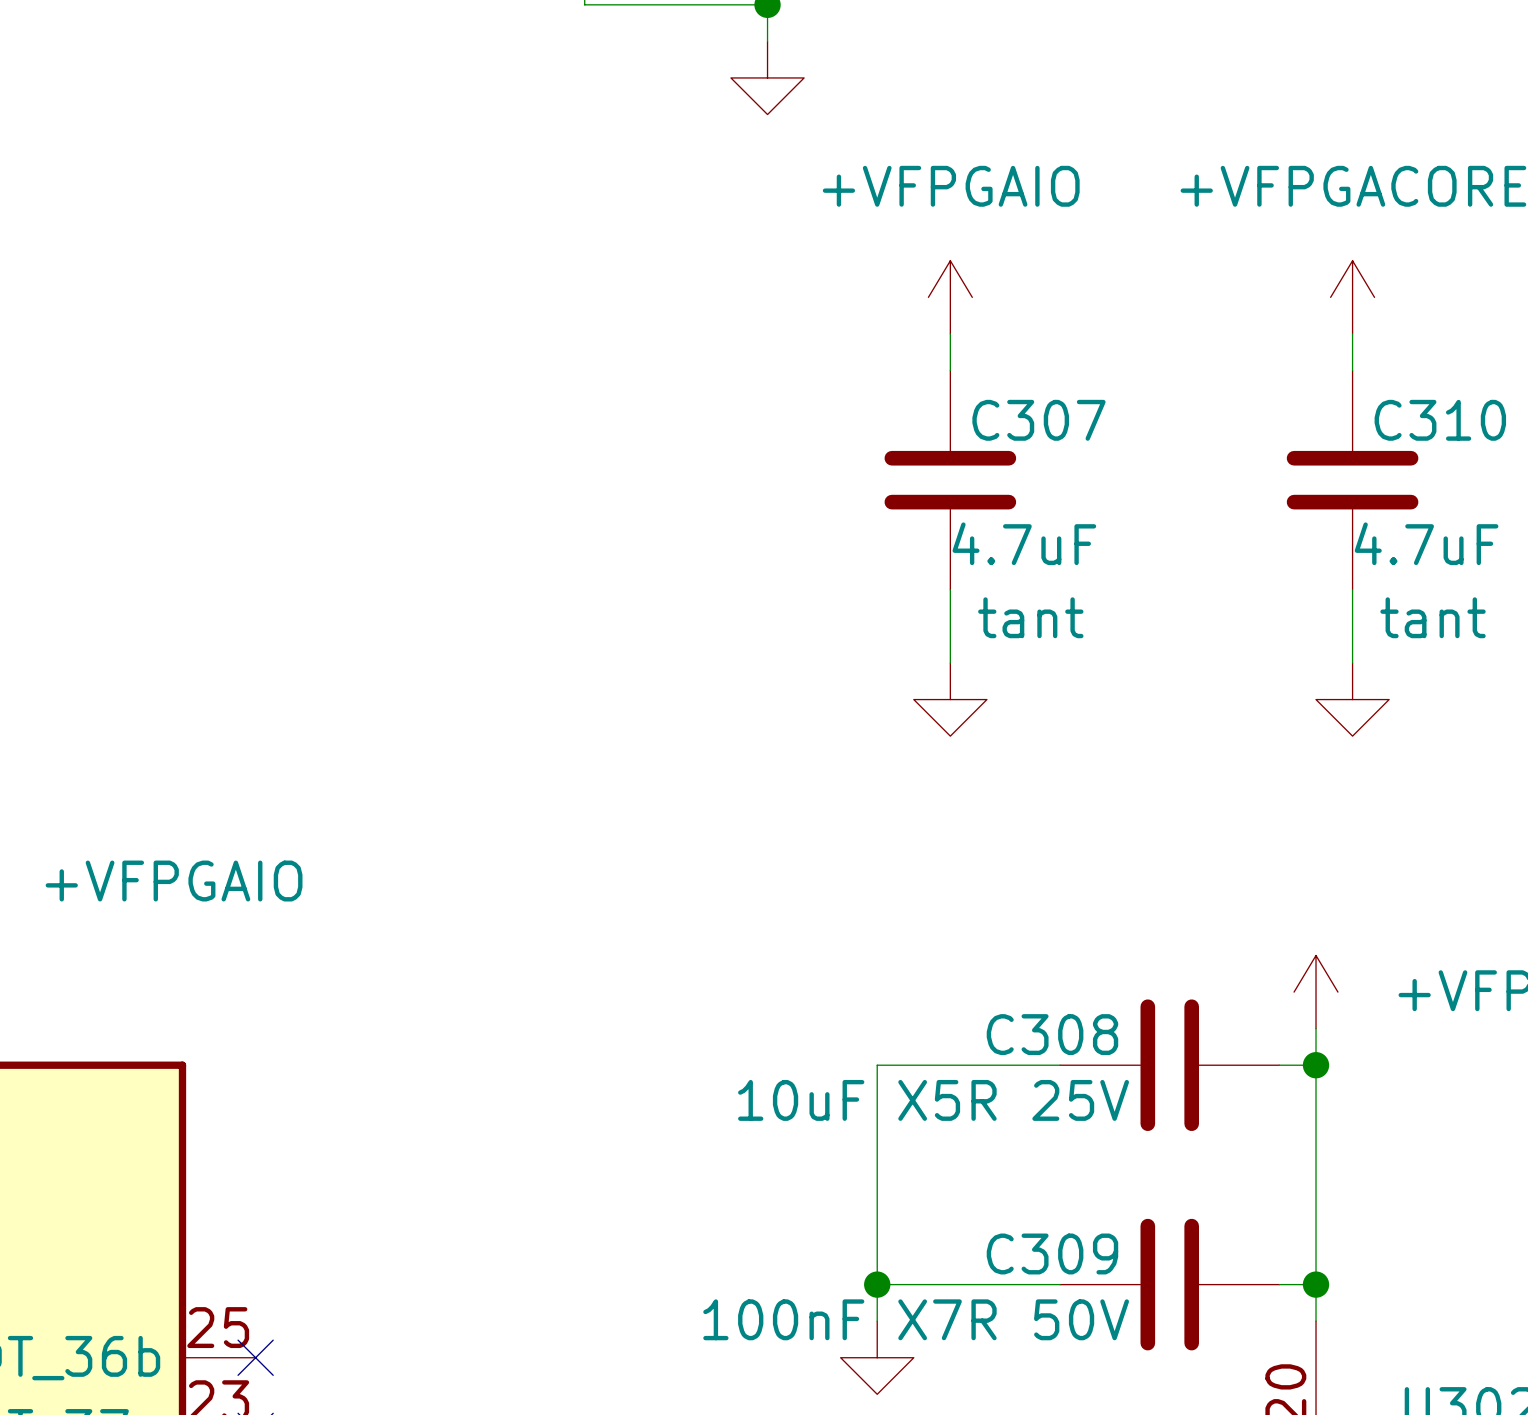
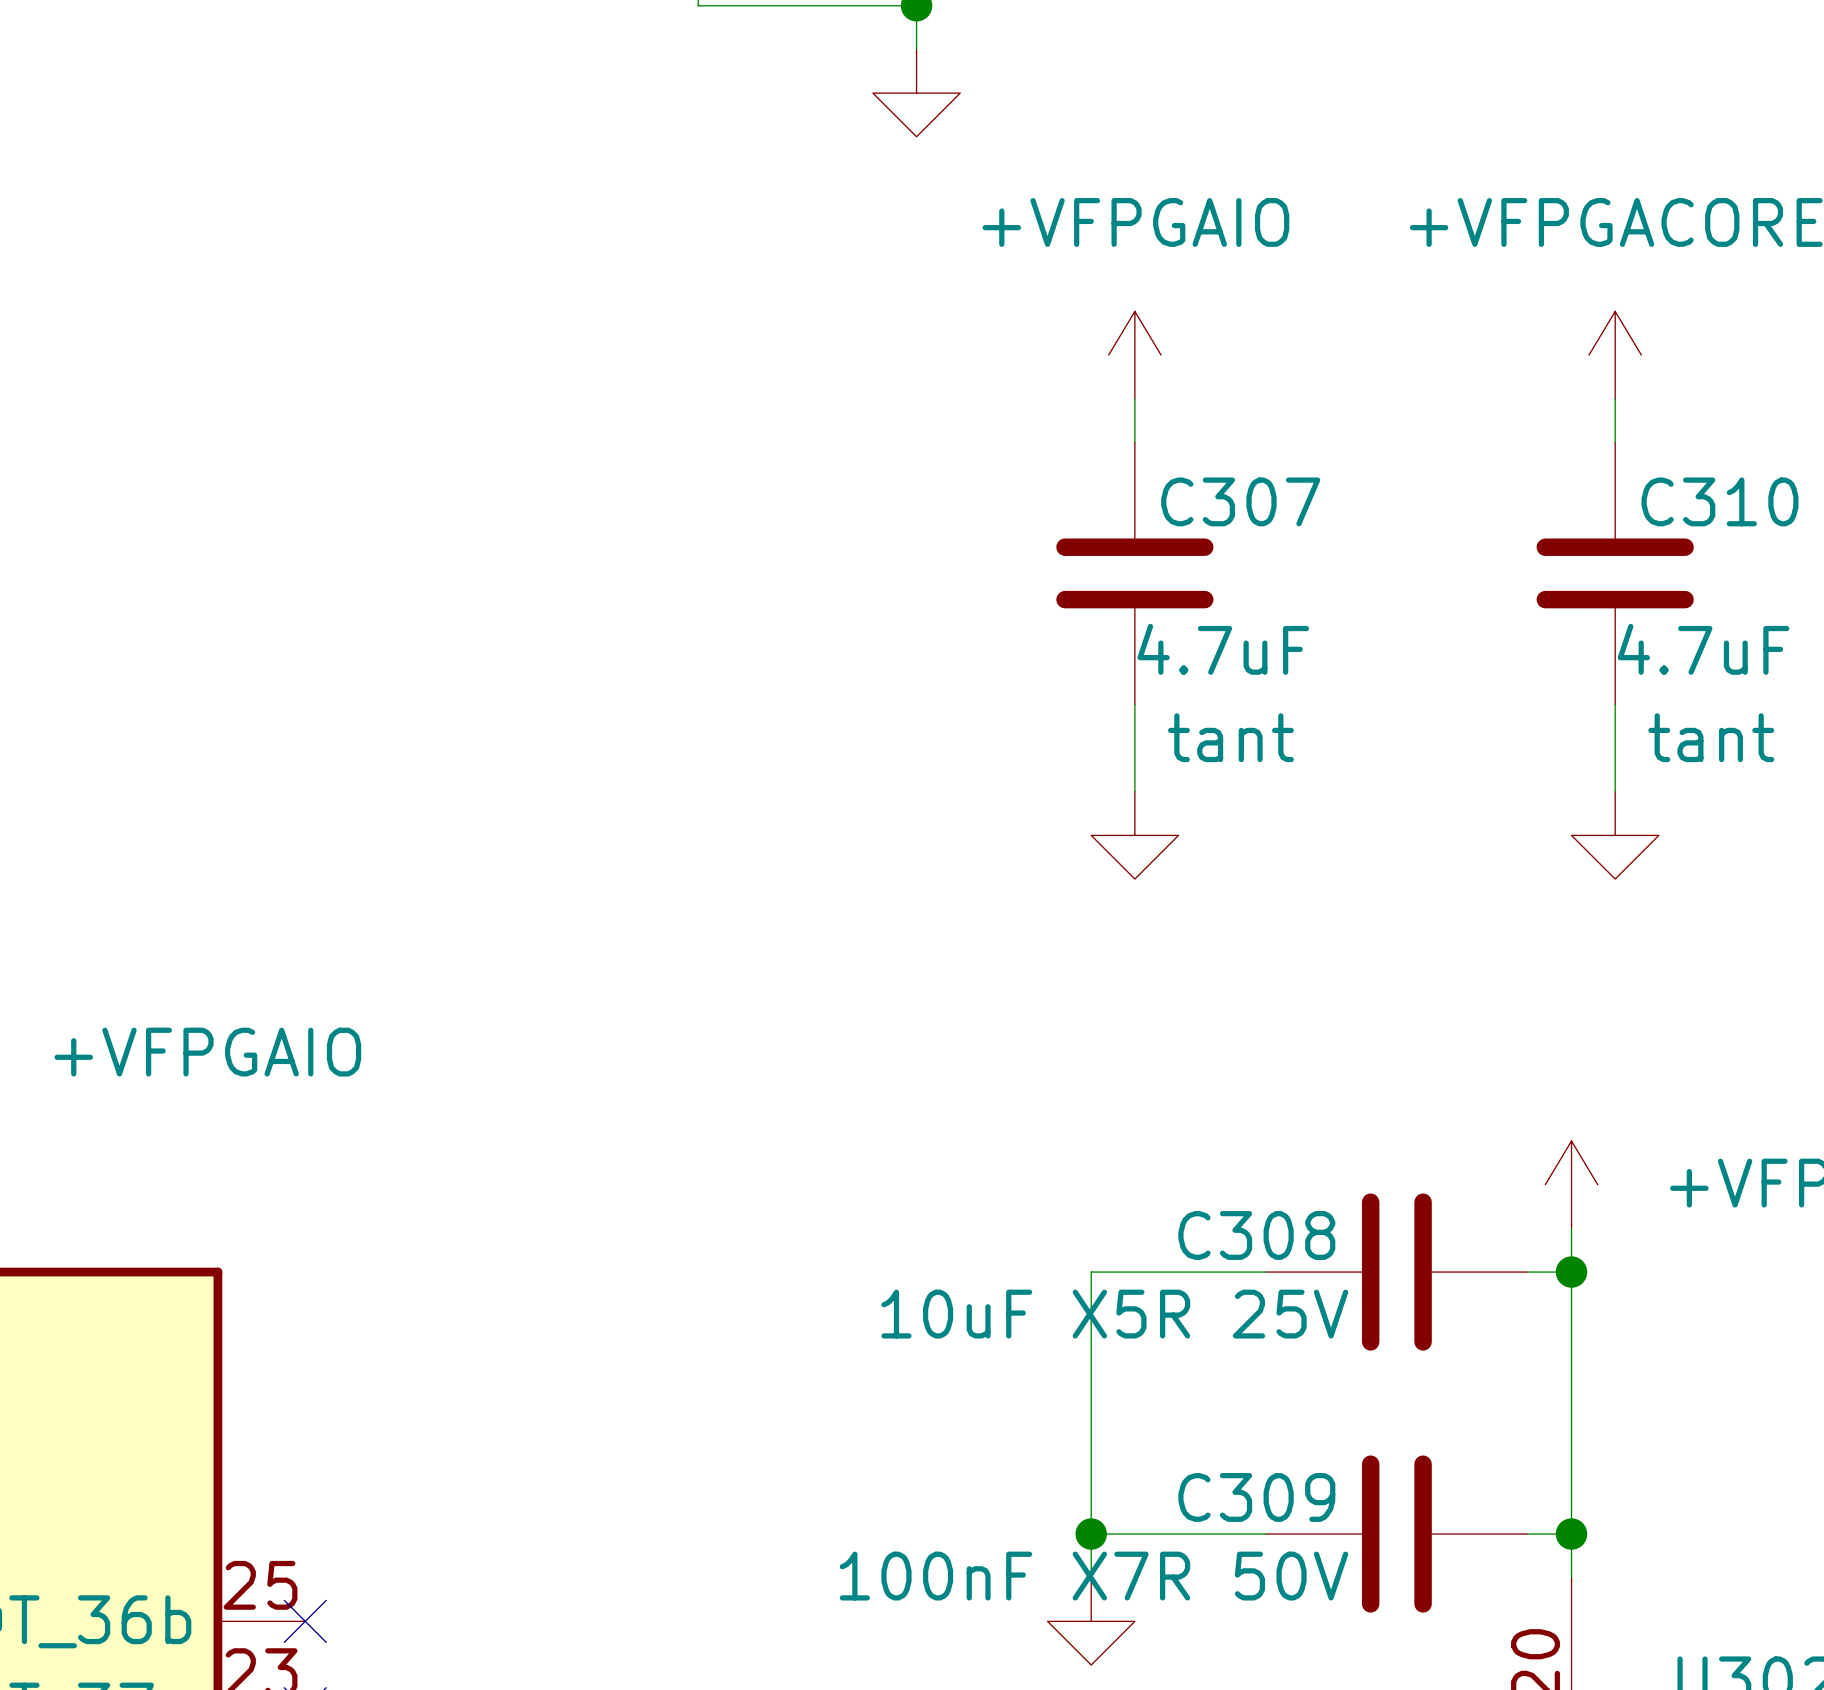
wire: (913, 1065) (877, 1065) (877, 1321) -> (1091, 1272) (1091, 1577)
wire: (877, 1284) (913, 1284) -> none
junction position: (877, 1284) -> (1091, 1534)
power symbol position: (877, 1357) -> (1091, 1621)

